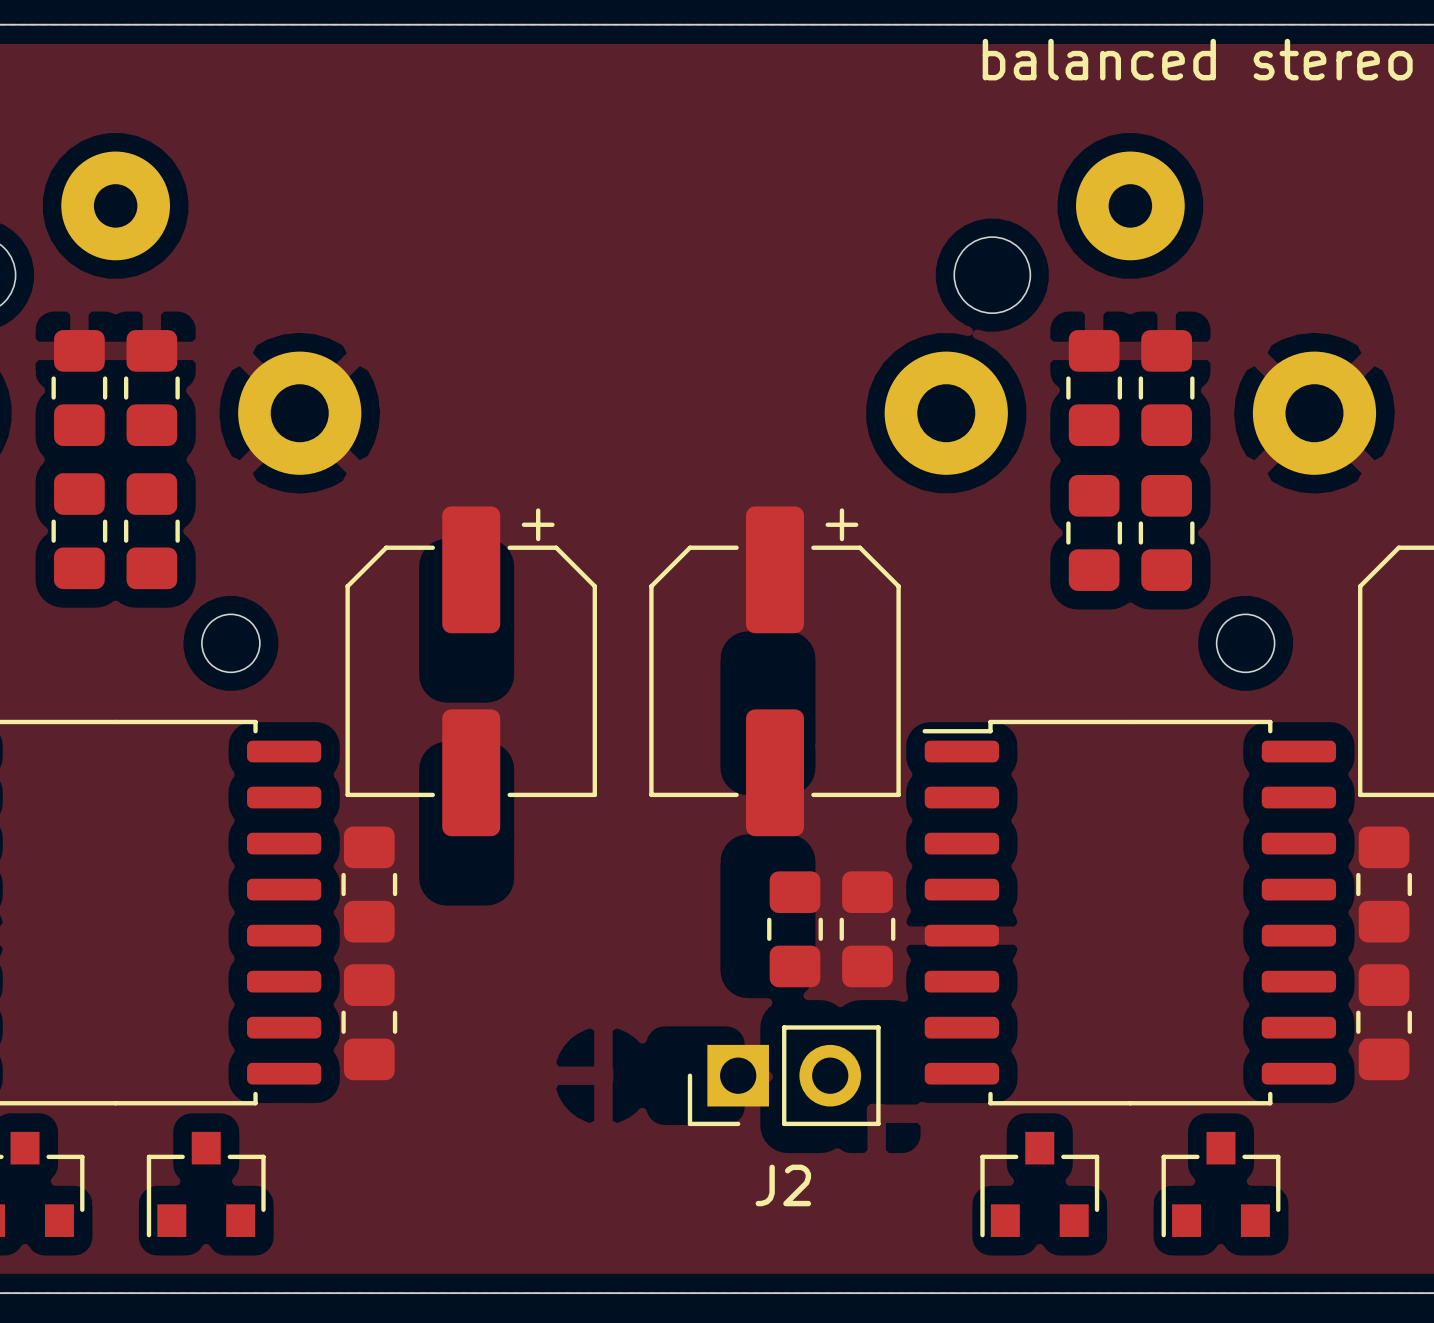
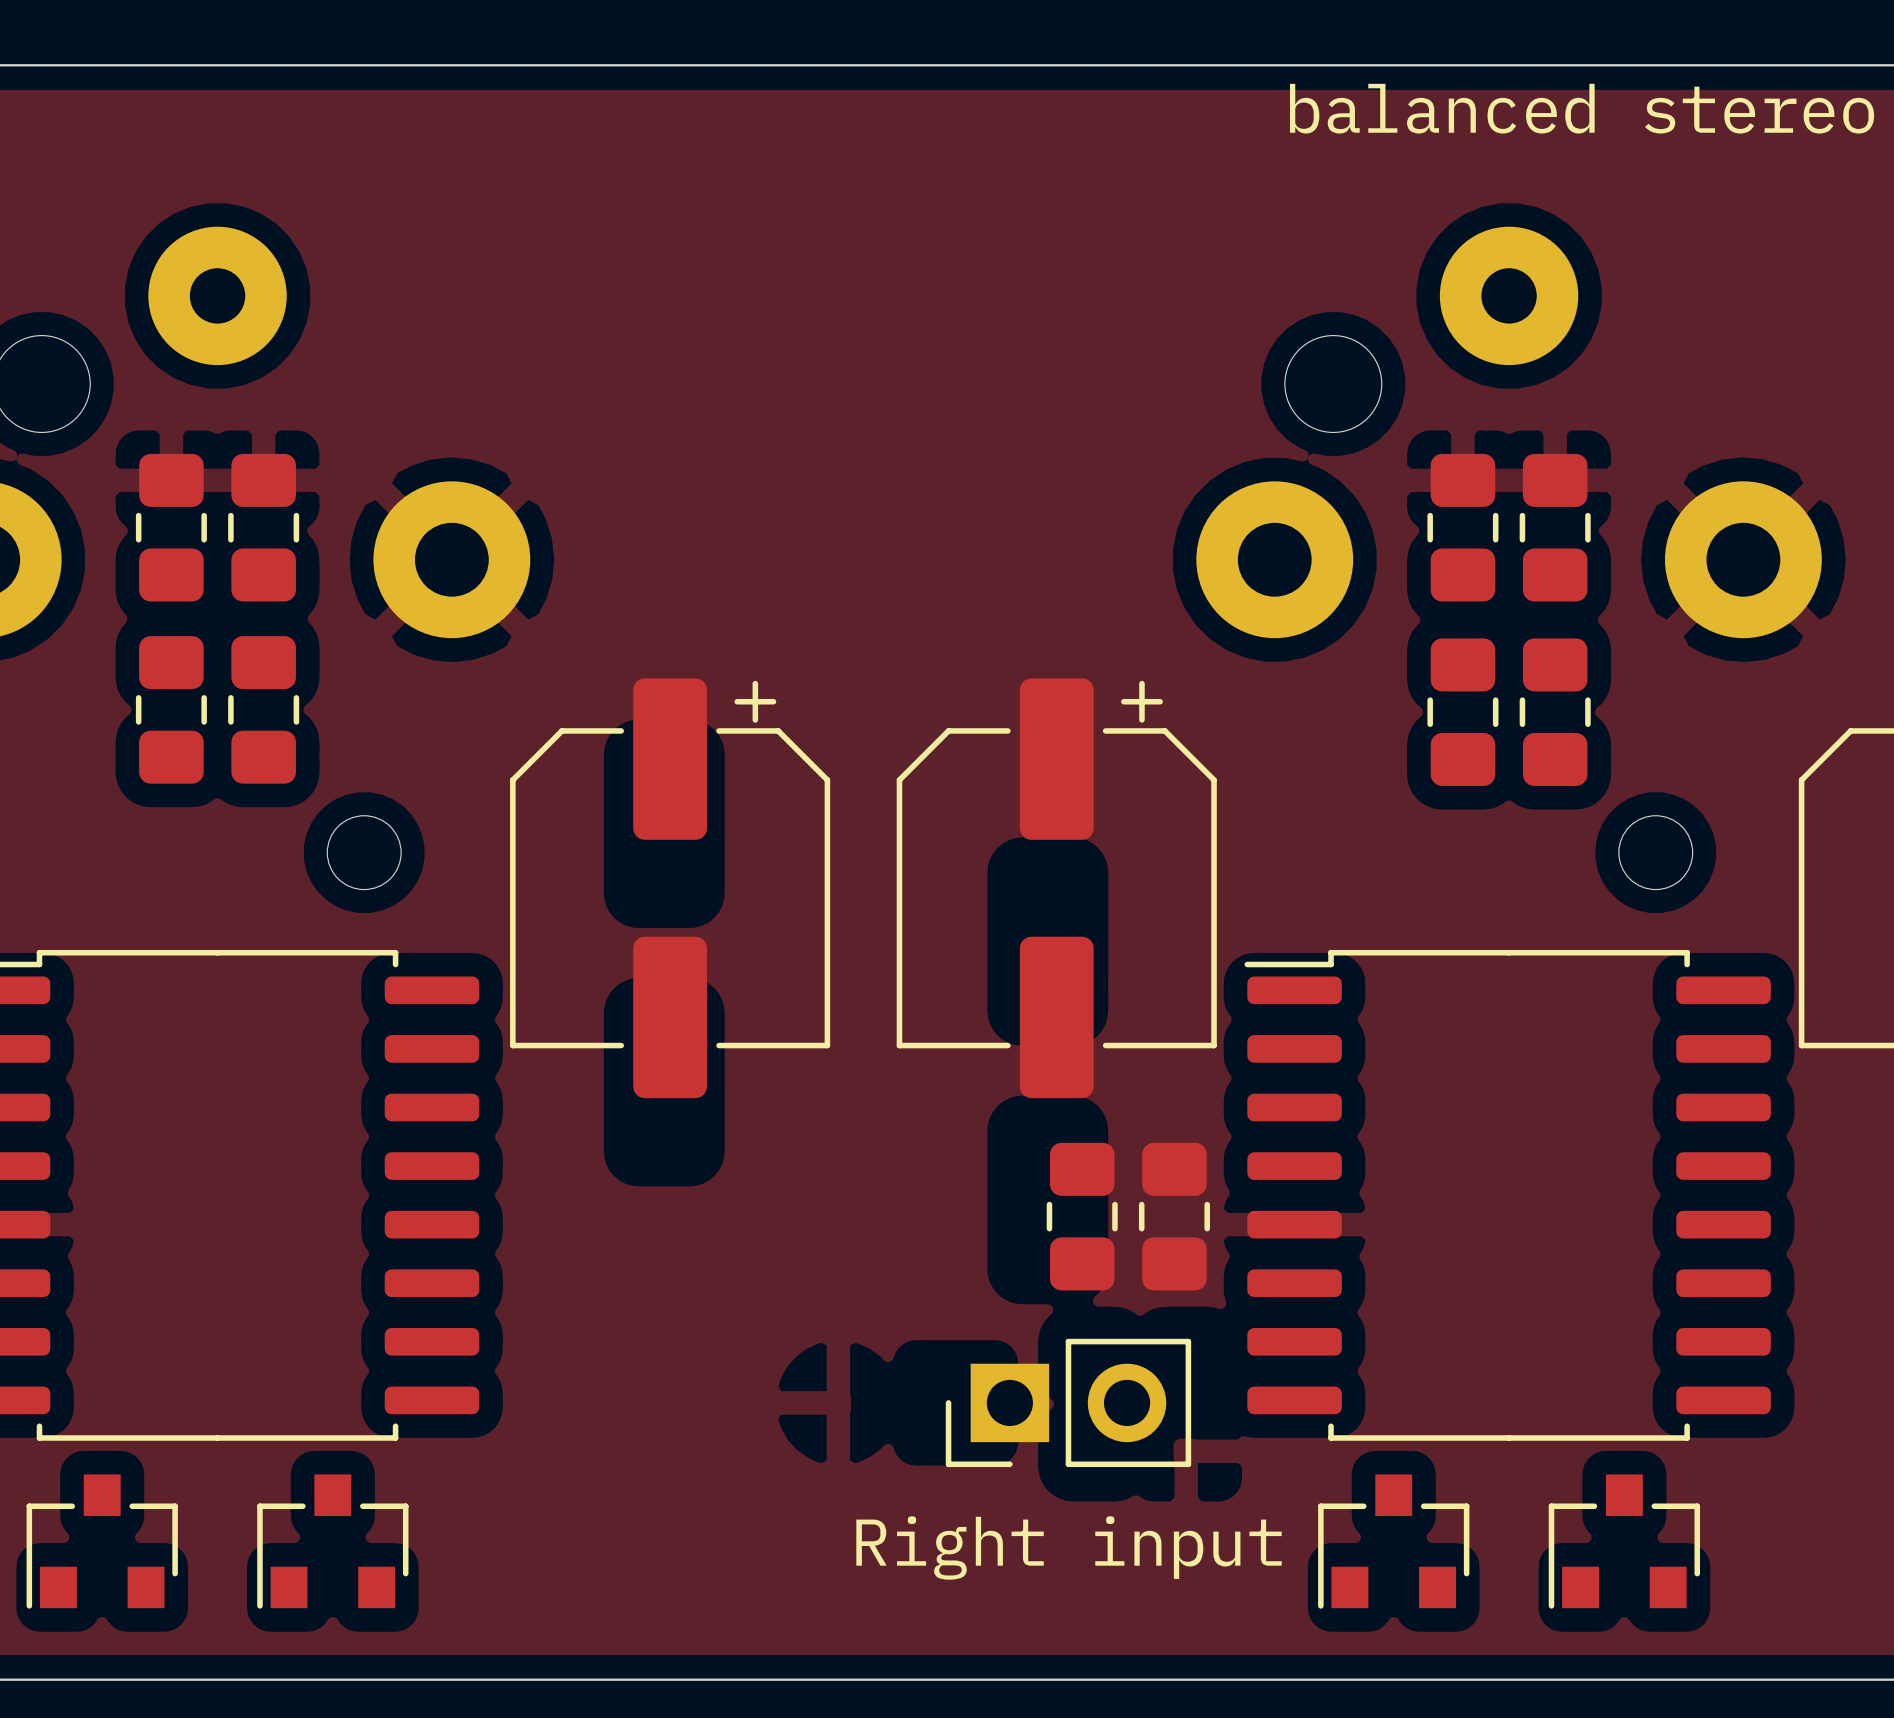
part: (369, 884) -> none
part: (1384, 884) -> none
part: (369, 1022) -> none
part: (1384, 1022) -> none
J2 name: J2 (783, 1185) -> Right input (1068, 1547)

